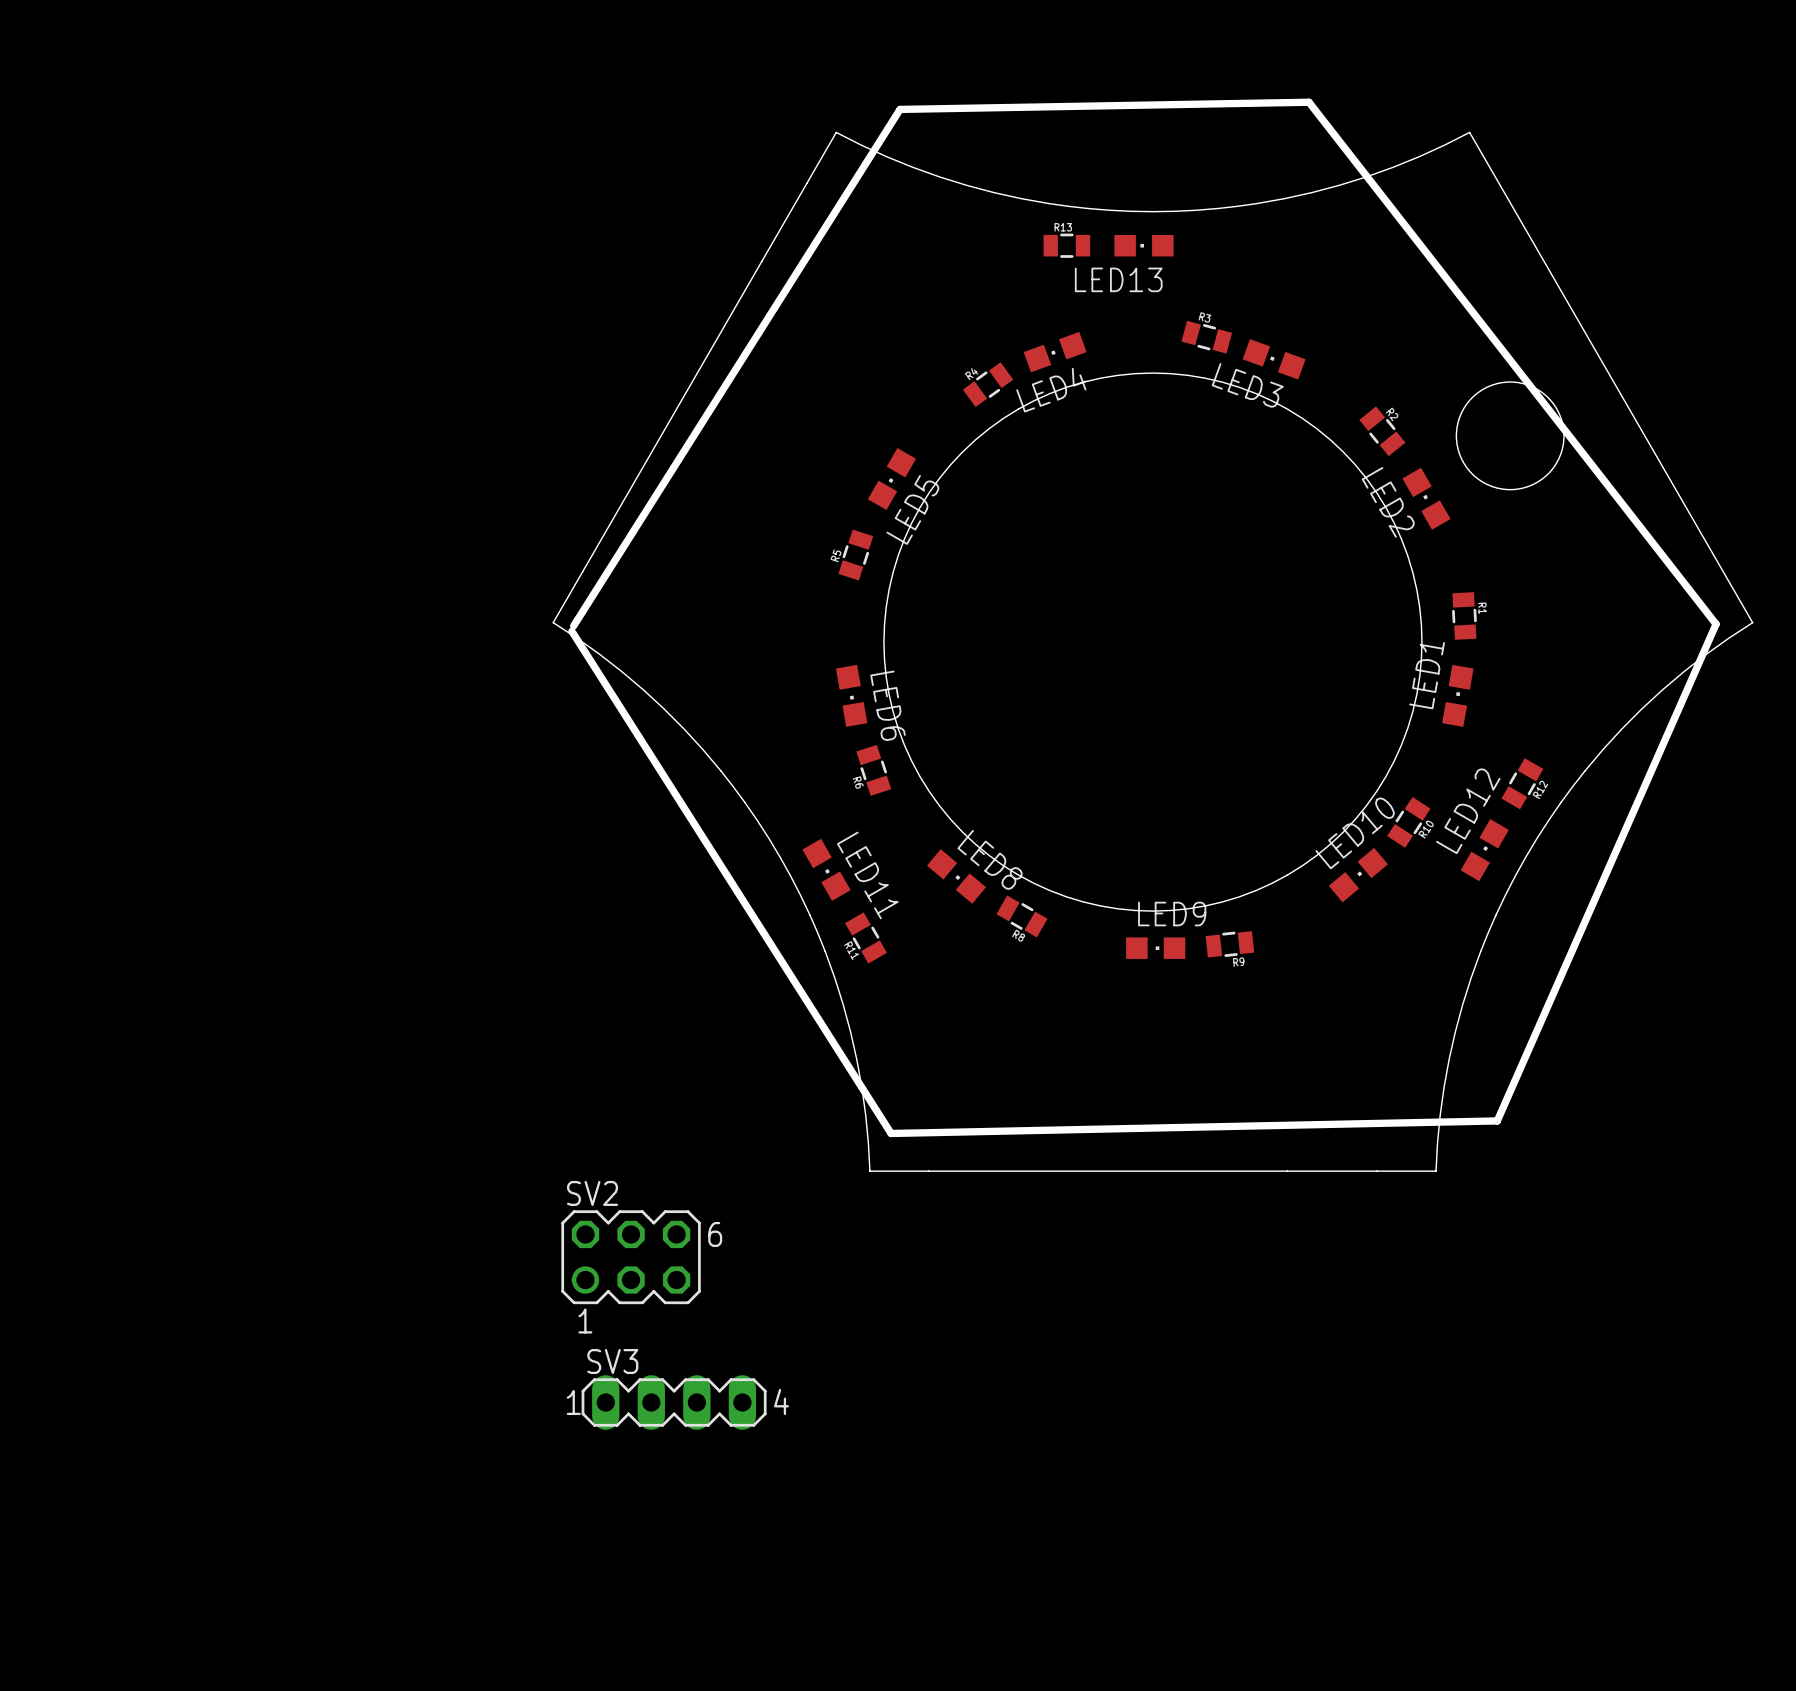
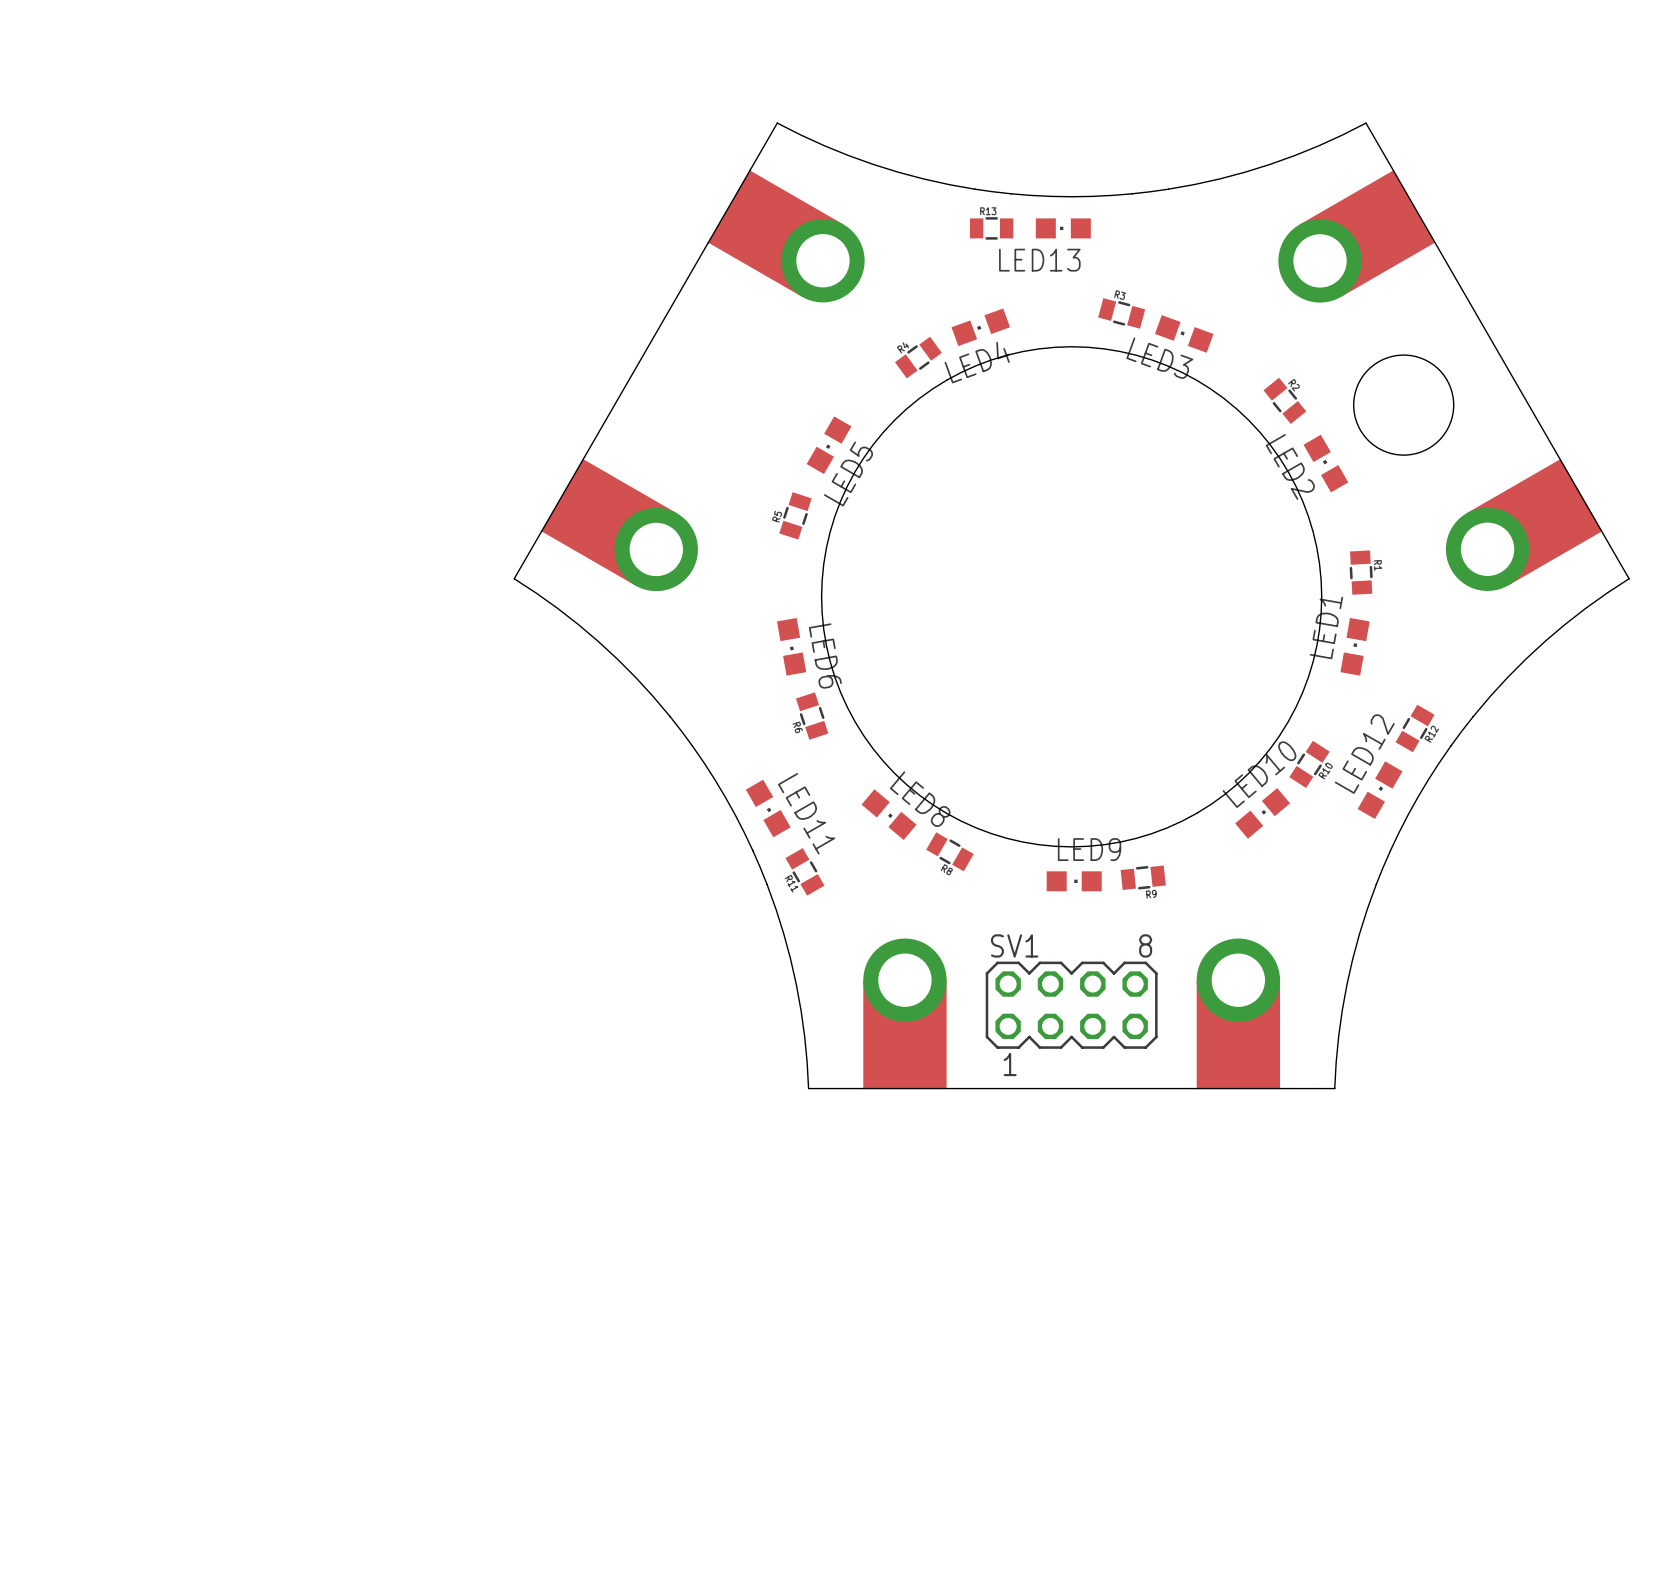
part: none -> (786, 236)
part: none -> (1356, 236)
part: none -> (1524, 524)
part: none -> (619, 525)
board edge: (573, 625) (900, 109) (1308, 102) (1716, 624) (1497, 1120) (891, 1133) (571, 631) -> none
SV1: none -> (1071, 1005)
part: none -> (904, 1013)
part: none -> (1238, 1013)
SV2: (631, 1257) -> none
SV3: (674, 1402) -> none

